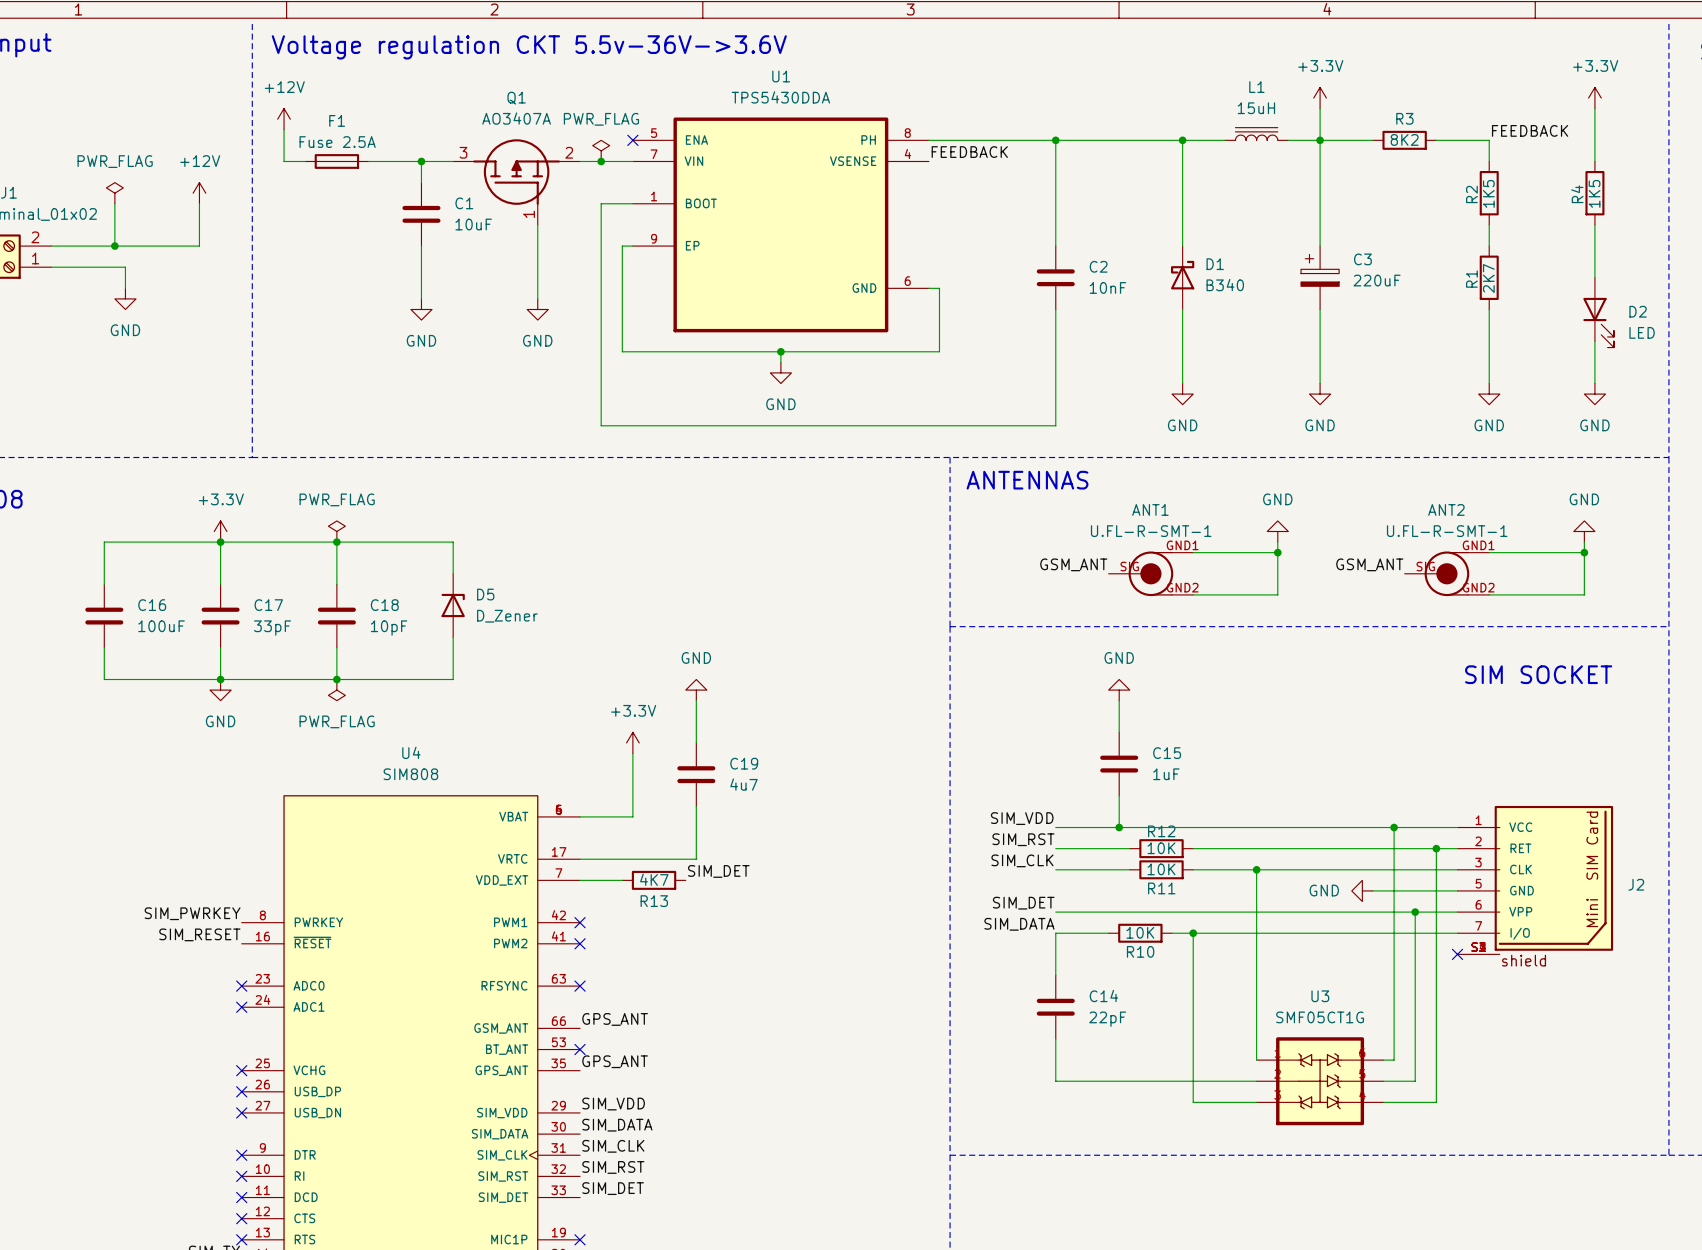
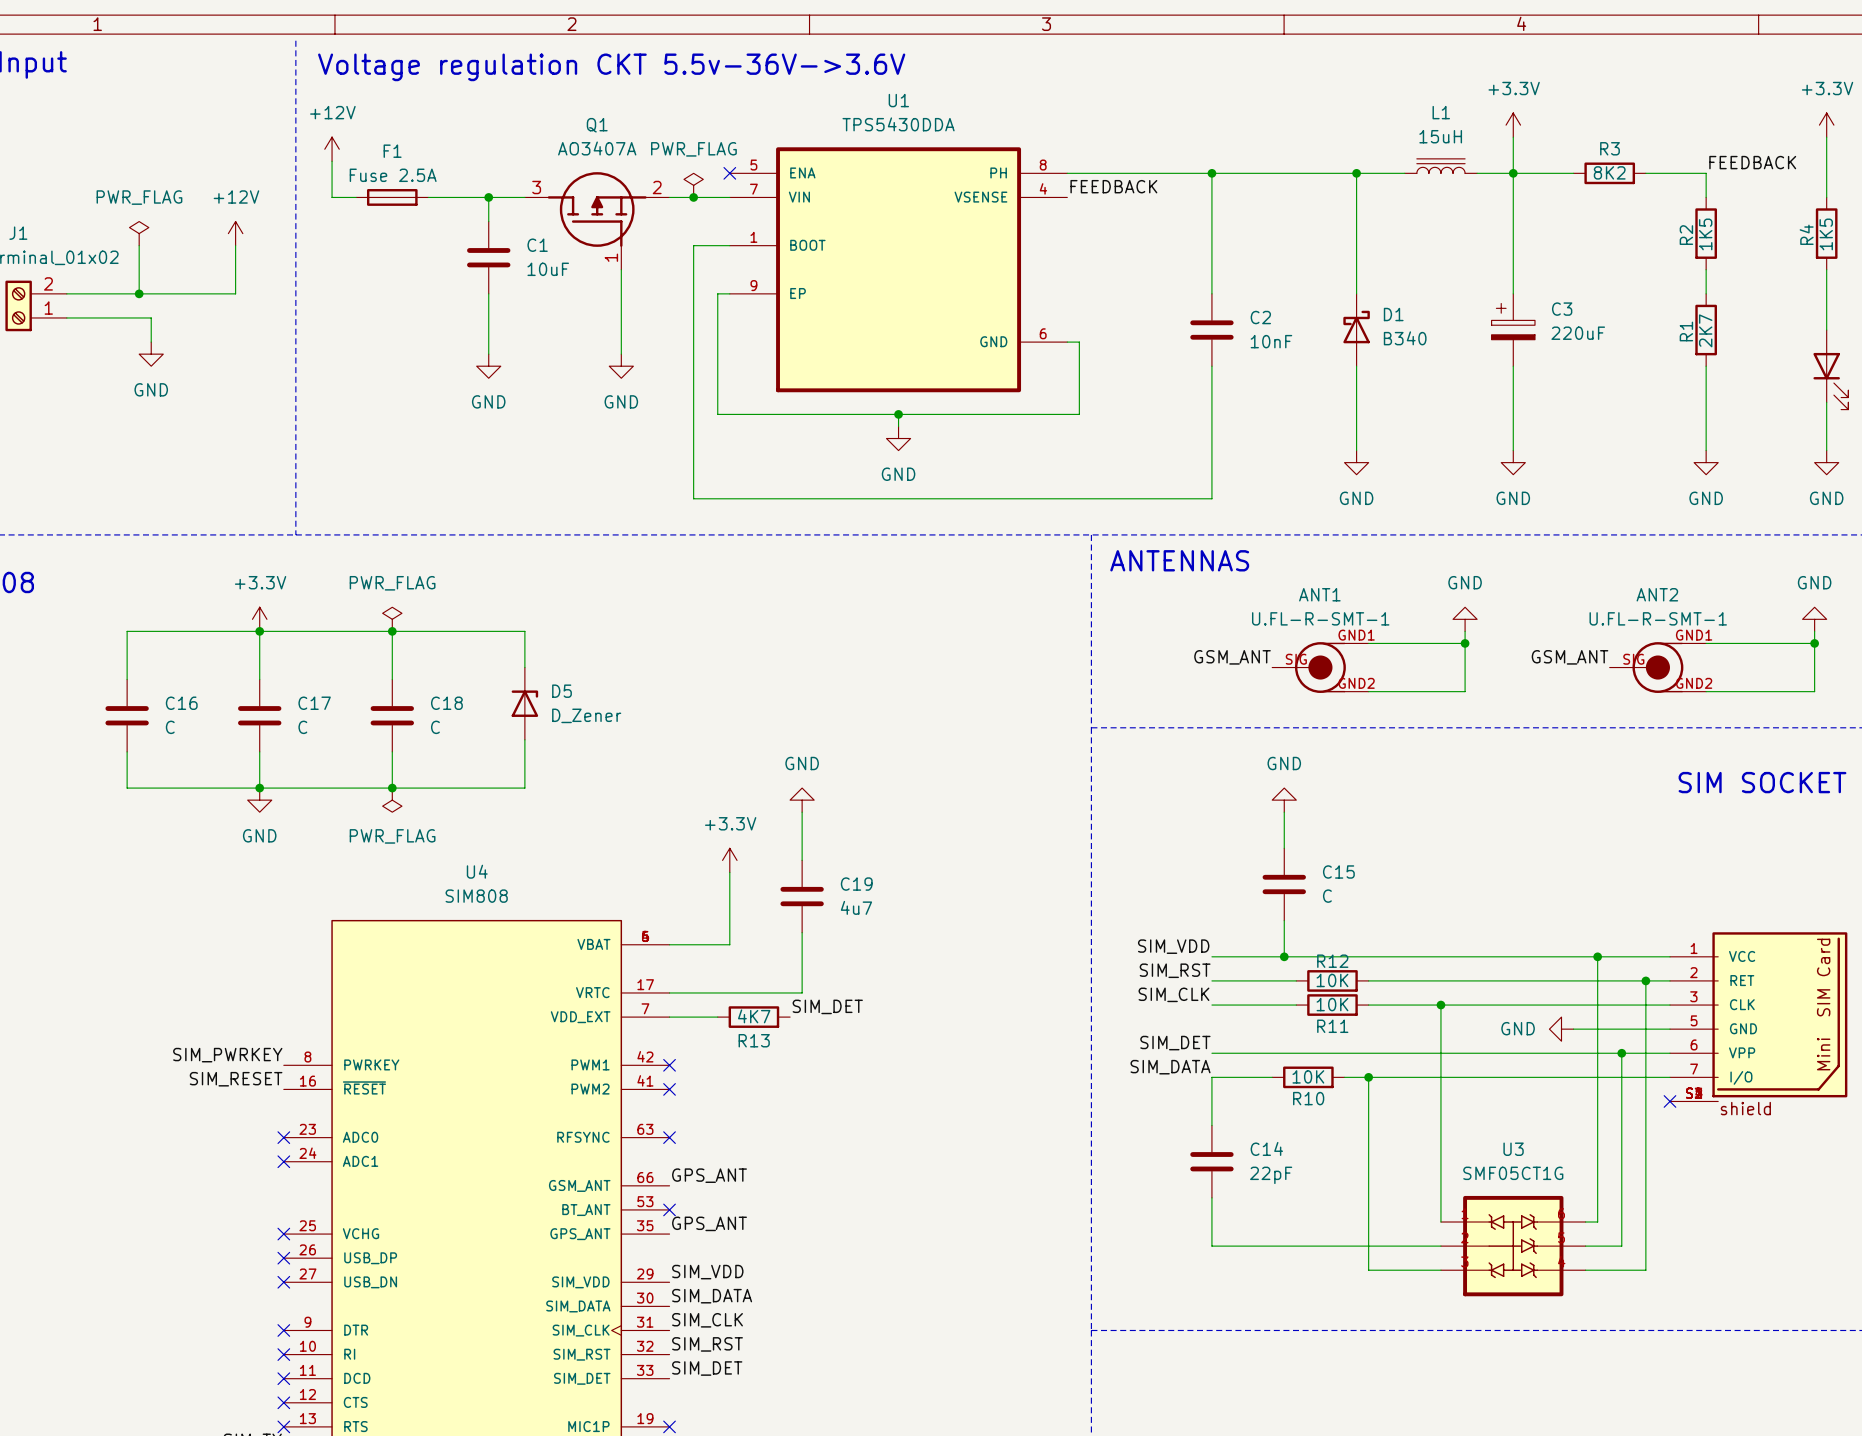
C16 value: 100uF (161, 626) -> C (170, 727)
C17 value: 33pF (272, 628) -> C (302, 727)
C18 value: 10pF (389, 628) -> C (435, 727)
C15 value: 1uF (1166, 774) -> C (1327, 896)

